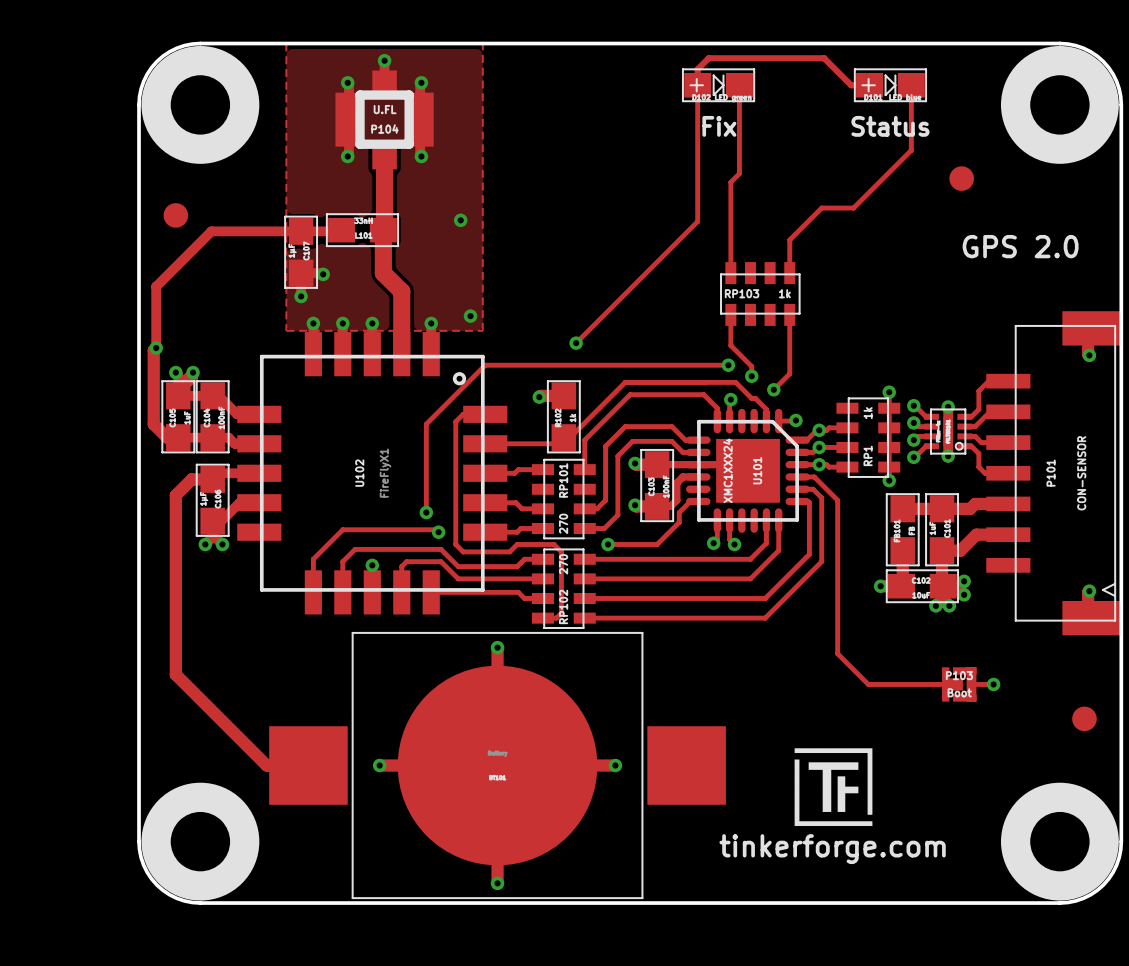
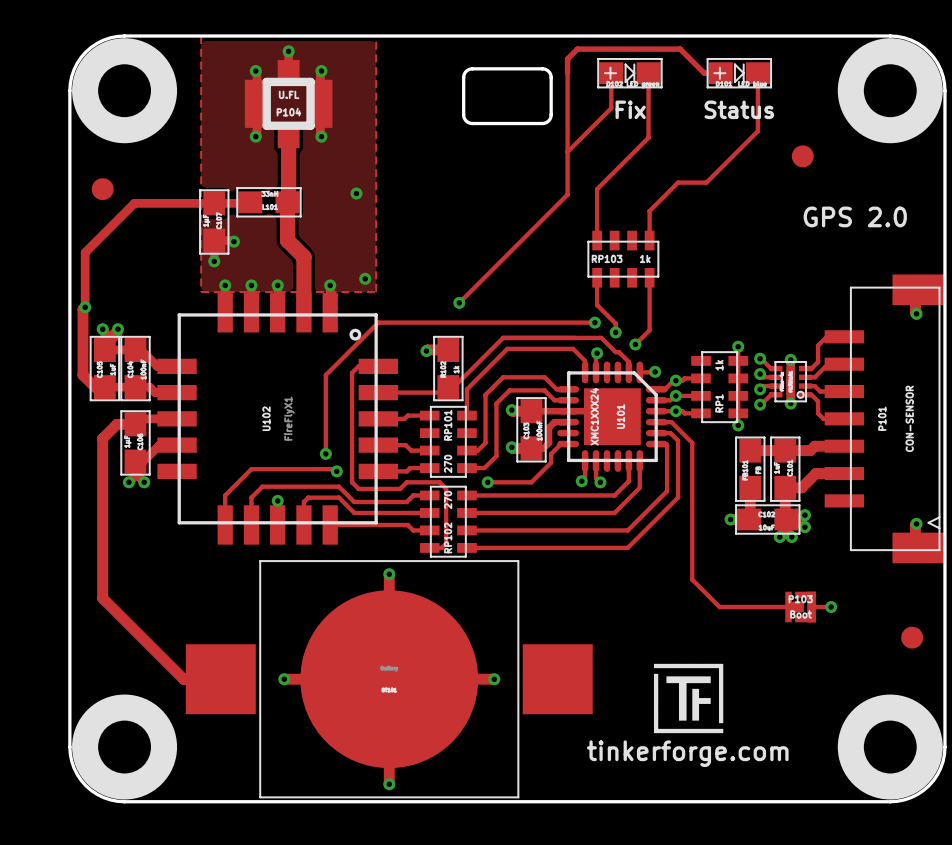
board edge: none -> (472, 68) (546, 70) (551, 77) (550, 119) (542, 123) (468, 122) (463, 115) (463, 76) (466, 71) (472, 68)
part position: (718, 85) -> (629, 73)
track: (739, 85) (739, 173) (730, 182) (730, 215) -> (648, 73) (648, 137) (597, 189)
track: none -> (611, 73) (611, 108) (567, 151)
text position: Fix (719, 126) -> Fix (630, 109)

